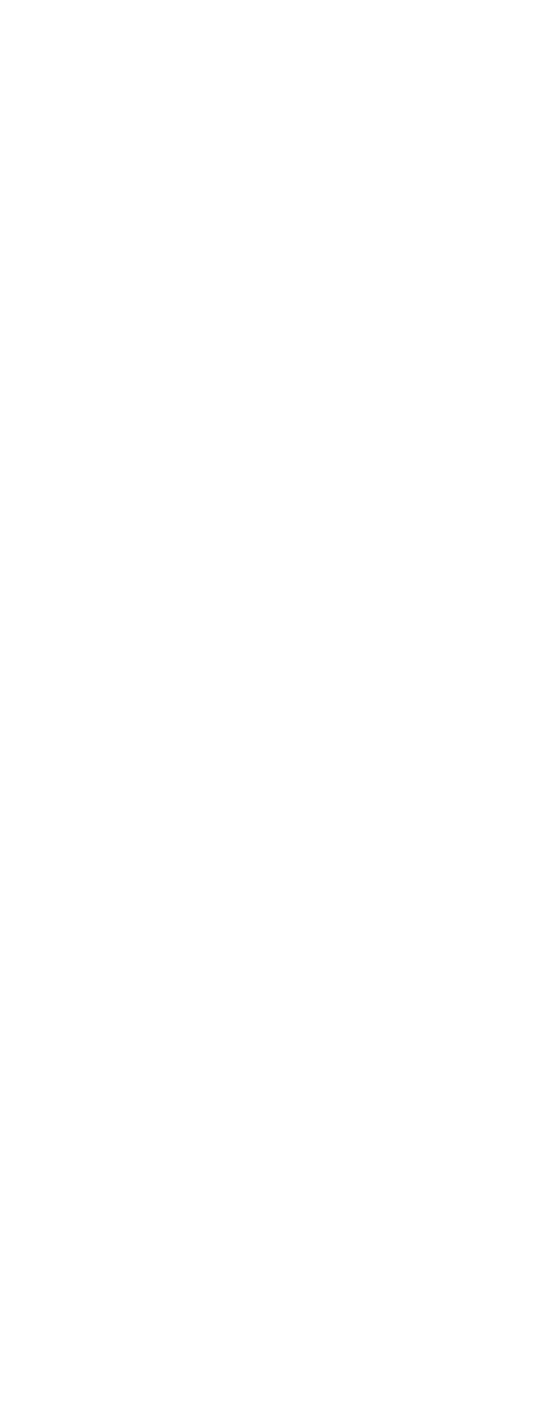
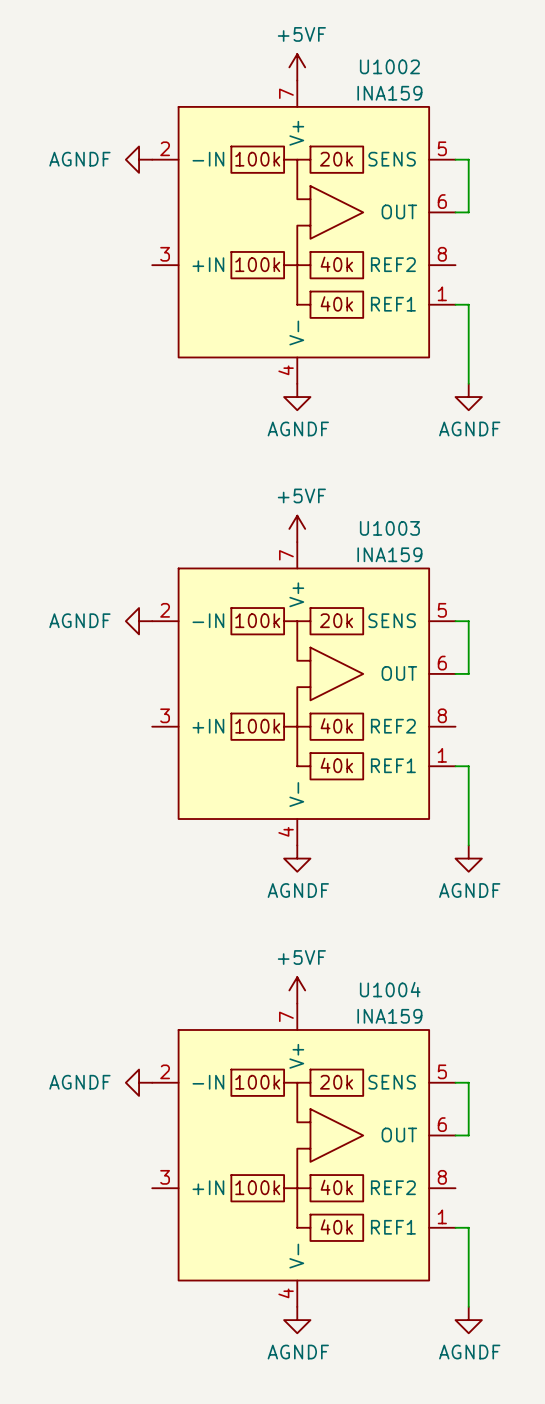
power symbol: none -> +5VF (297, 67)
power symbol: none -> AGNDF (139, 159)
wire: none -> (455, 159) (468, 159) (468, 212) (455, 212)
U1002: none -> INA159 (303, 232)
wire: none -> (455, 304) (468, 304) (468, 383)
power symbol: none -> AGNDF (297, 397)
power symbol: none -> AGNDF (468, 397)
power symbol: none -> +5VF (297, 528)
power symbol: none -> AGNDF (139, 621)
wire: none -> (455, 621) (468, 621) (468, 673) (455, 673)
U1003: none -> INA159 (303, 693)
wire: none -> (455, 766) (468, 766) (468, 845)
power symbol: none -> AGNDF (297, 858)
power symbol: none -> AGNDF (468, 858)
power symbol: none -> +5VF (297, 990)
power symbol: none -> AGNDF (139, 1082)
wire: none -> (455, 1082) (468, 1082) (468, 1135) (455, 1135)
U1004: none -> INA159 (303, 1155)
wire: none -> (455, 1227) (468, 1227) (468, 1306)
power symbol: none -> AGNDF (297, 1320)
power symbol: none -> AGNDF (468, 1320)

